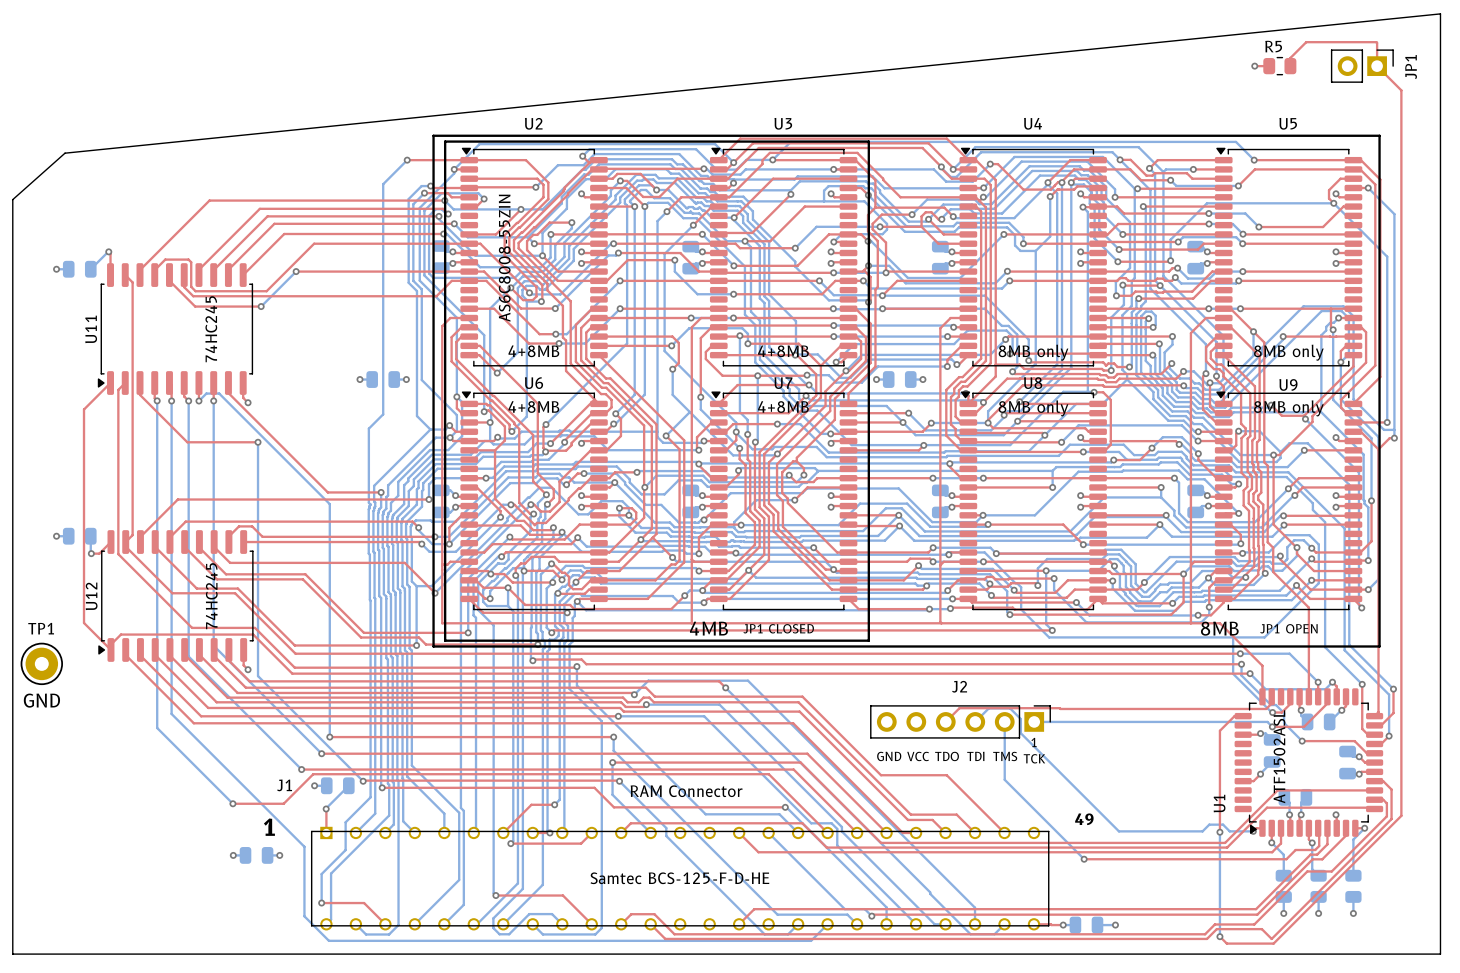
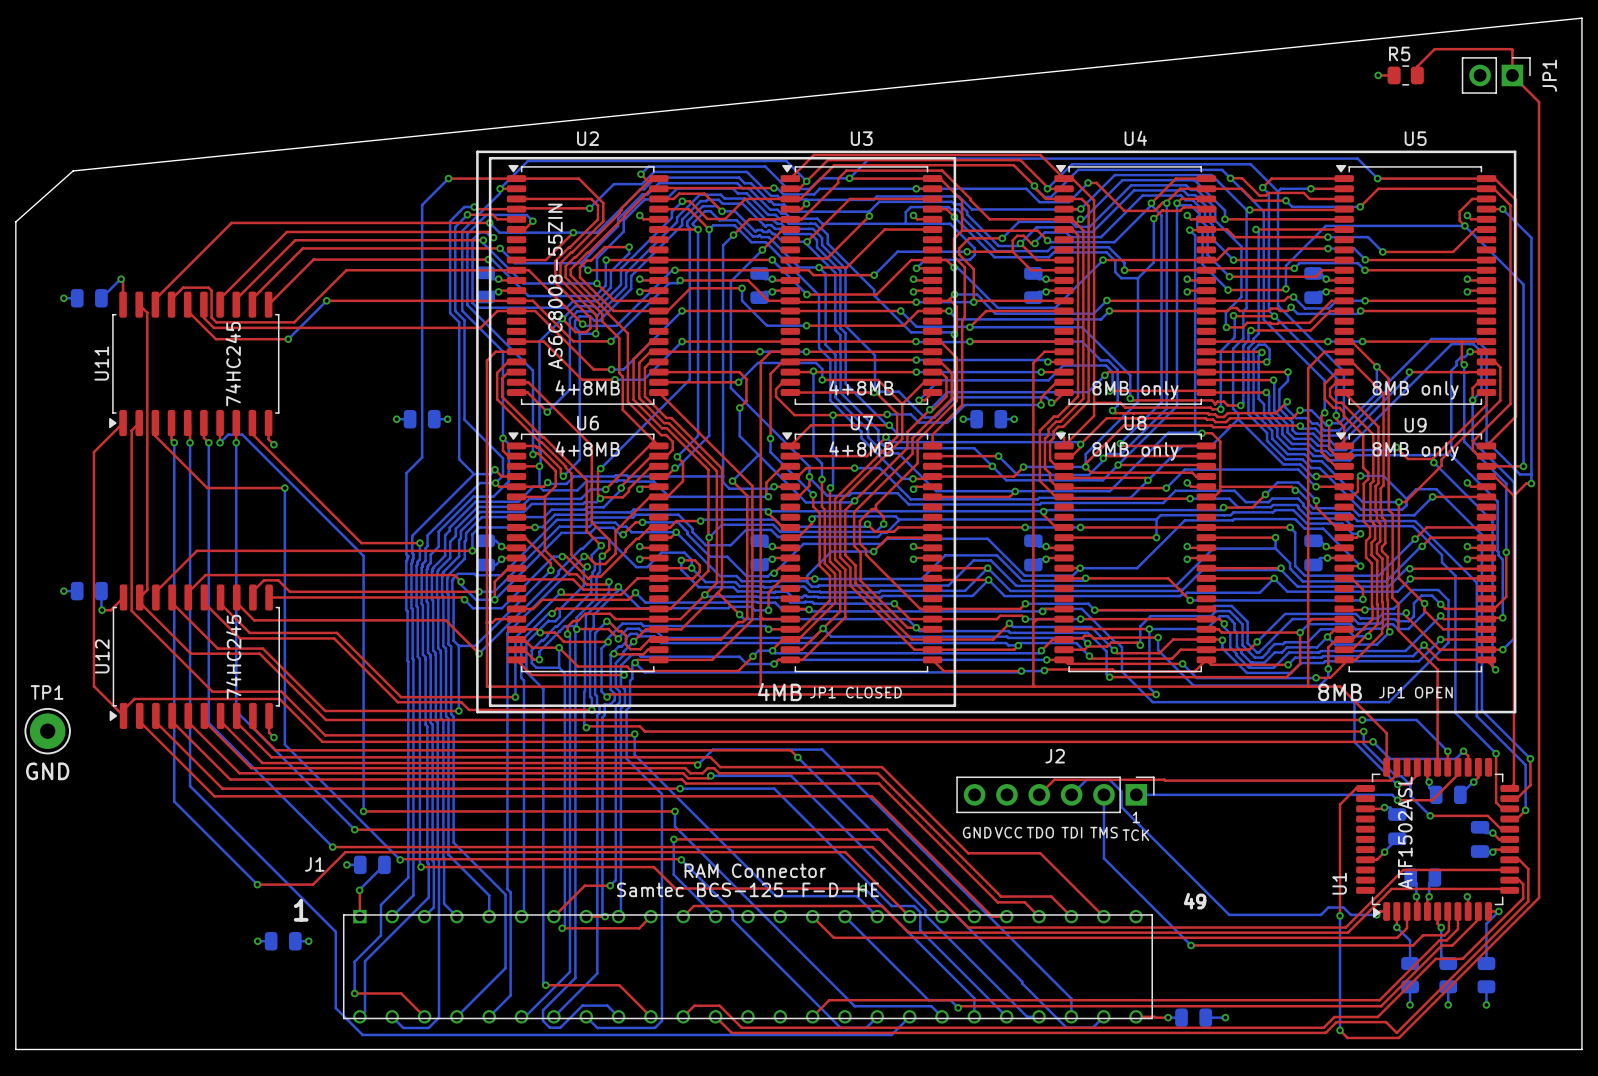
text position: Samtec BCS-125-F-D-HE (679, 878) -> Samtec BCS-125-F-D-HE (747, 889)

